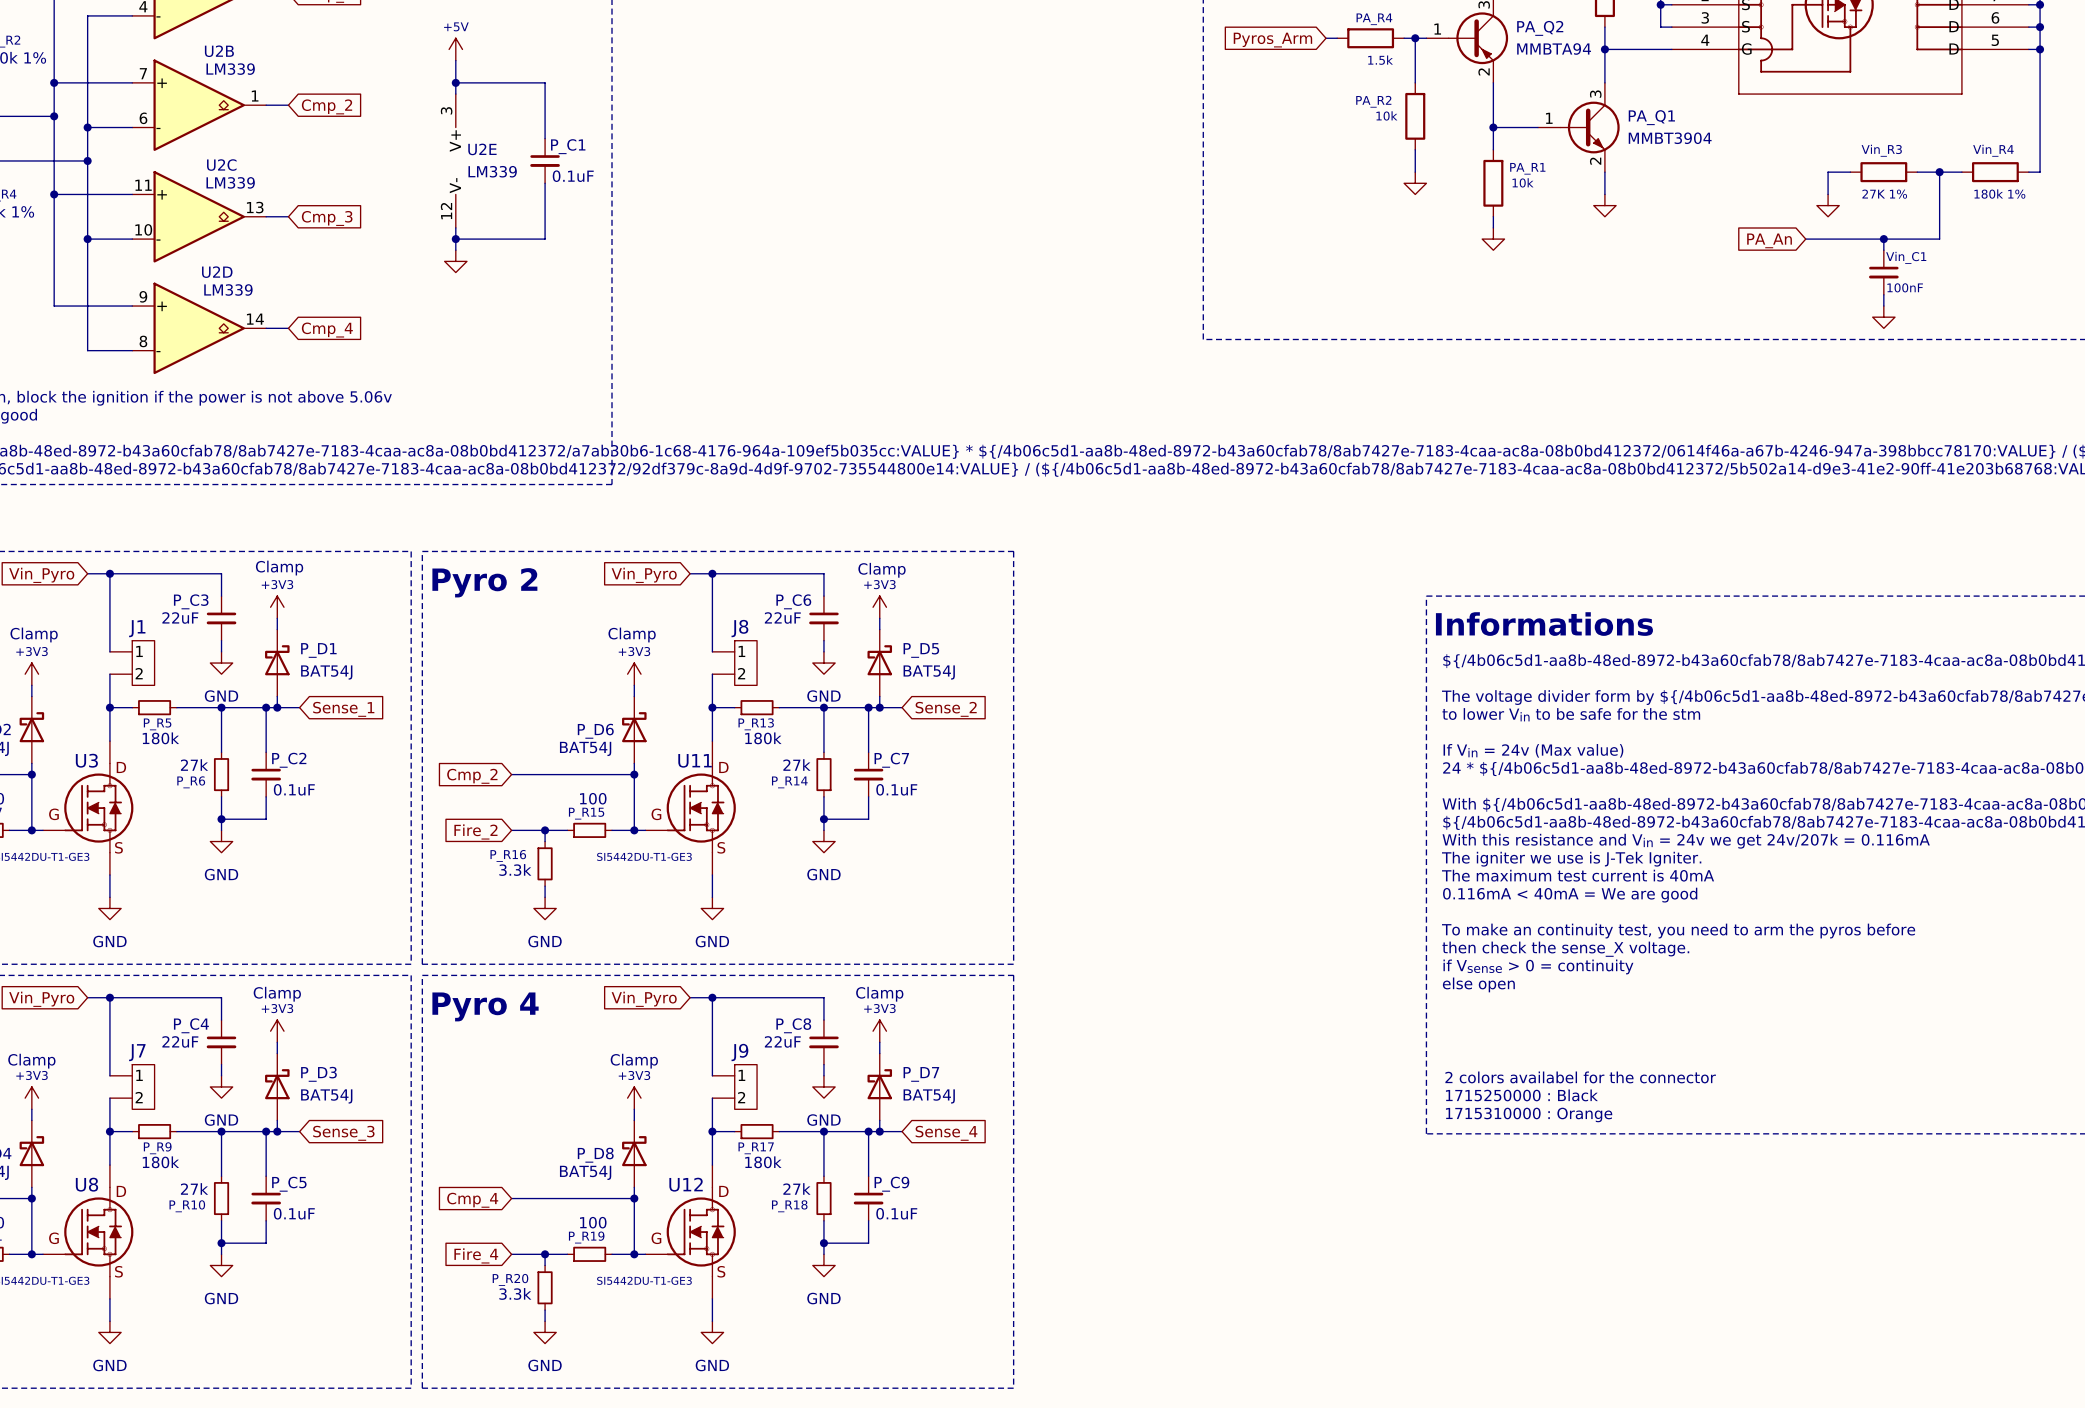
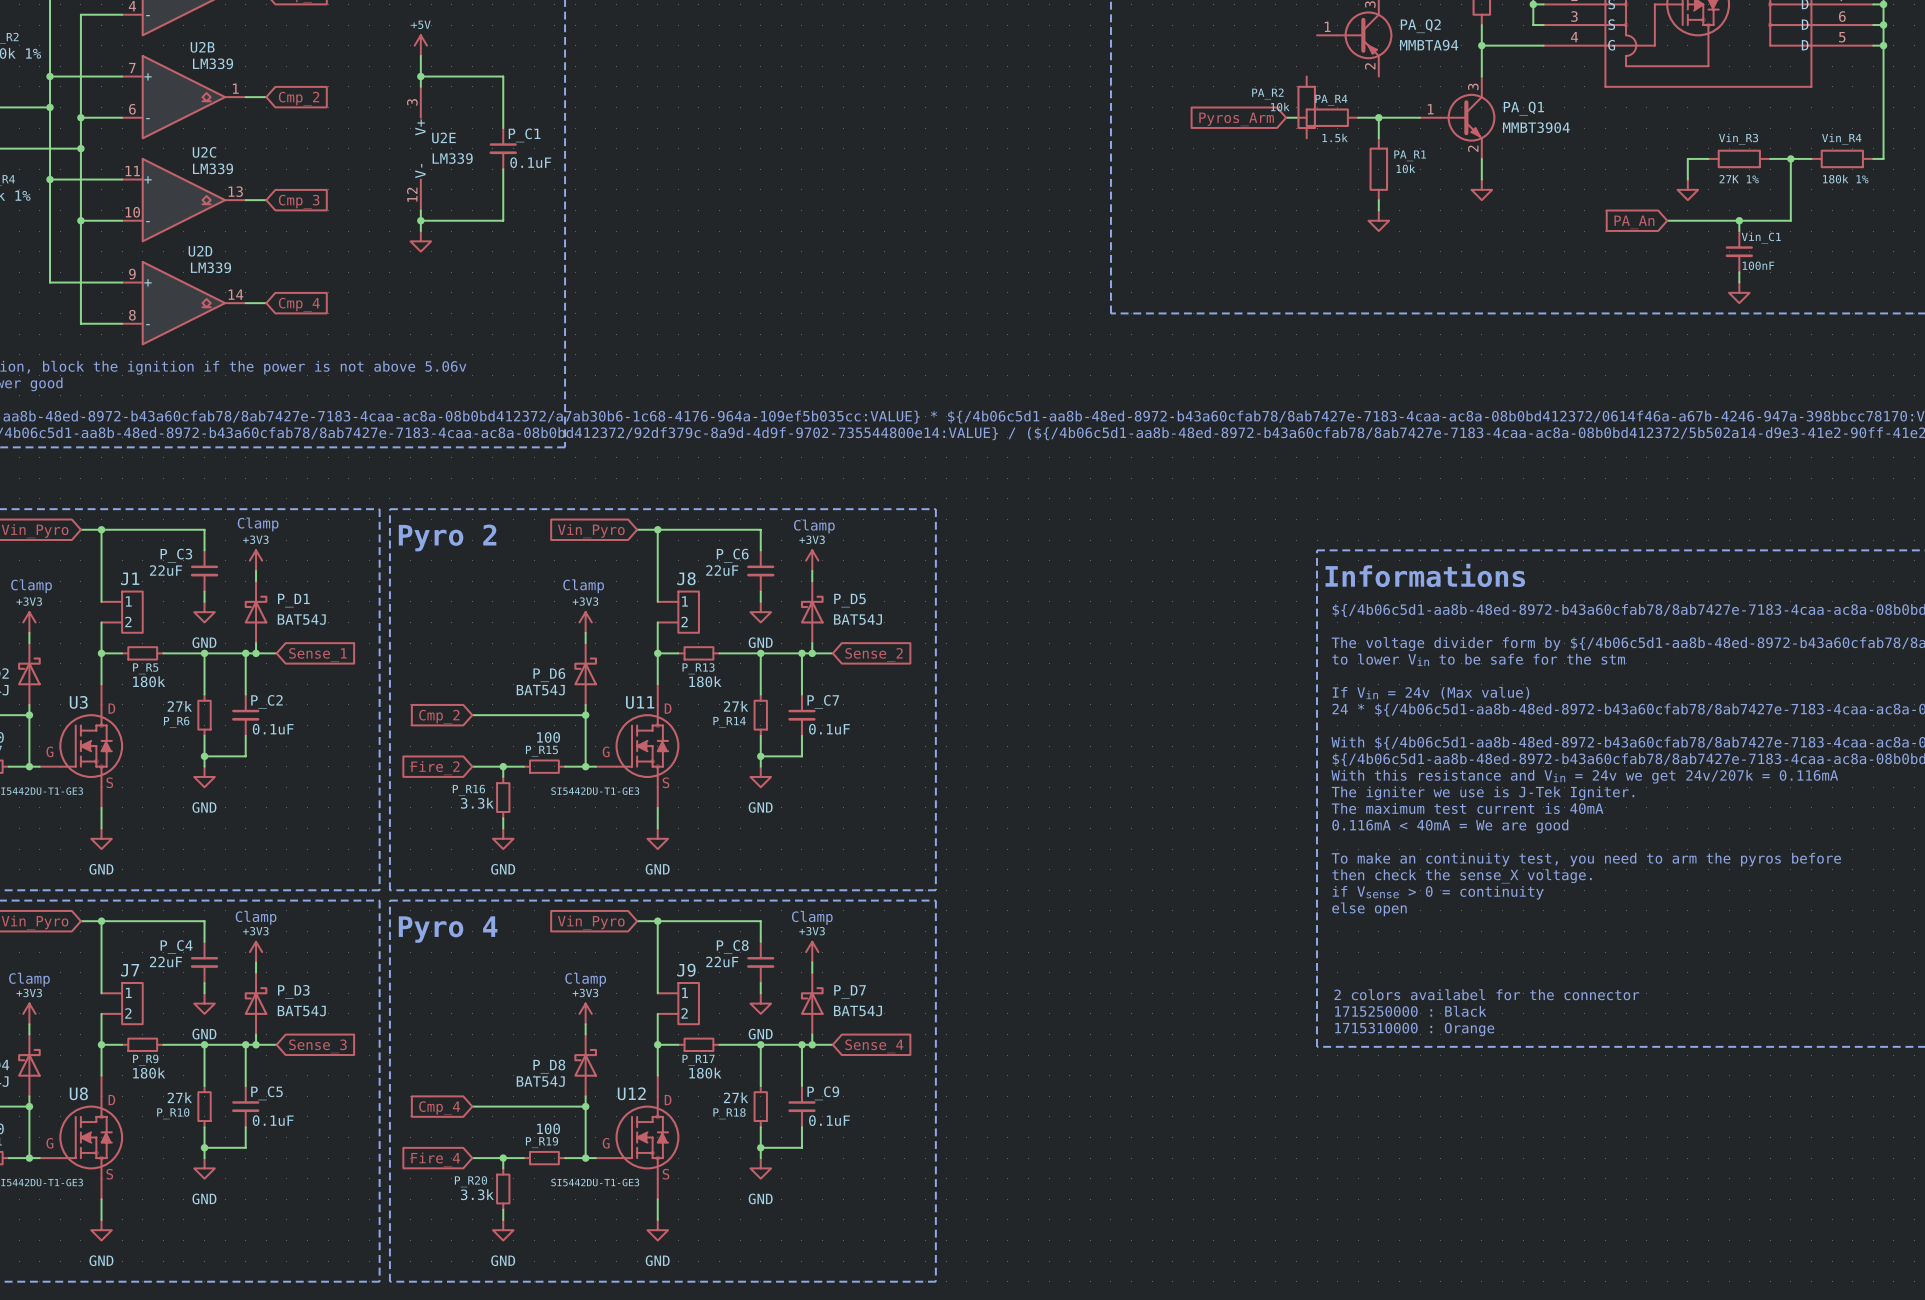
wire: (1326, 38) (1337, 38) -> (1286, 117) (1296, 117)
PA_R4 position: (1370, 38) -> (1327, 117)
wire: (1404, 38) (1426, 38) -> none
wire: (1415, 38) (1415, 82) -> none
junction: (1415, 38) -> none
global label position: Pyros_Arm (1272, 40) -> Pyros_Arm (1236, 119)
wire: (1493, 82) (1493, 127) -> (1358, 117) (1378, 117)
wire: (1415, 149) (1415, 172) -> none
power symbol: (1415, 183) -> none

